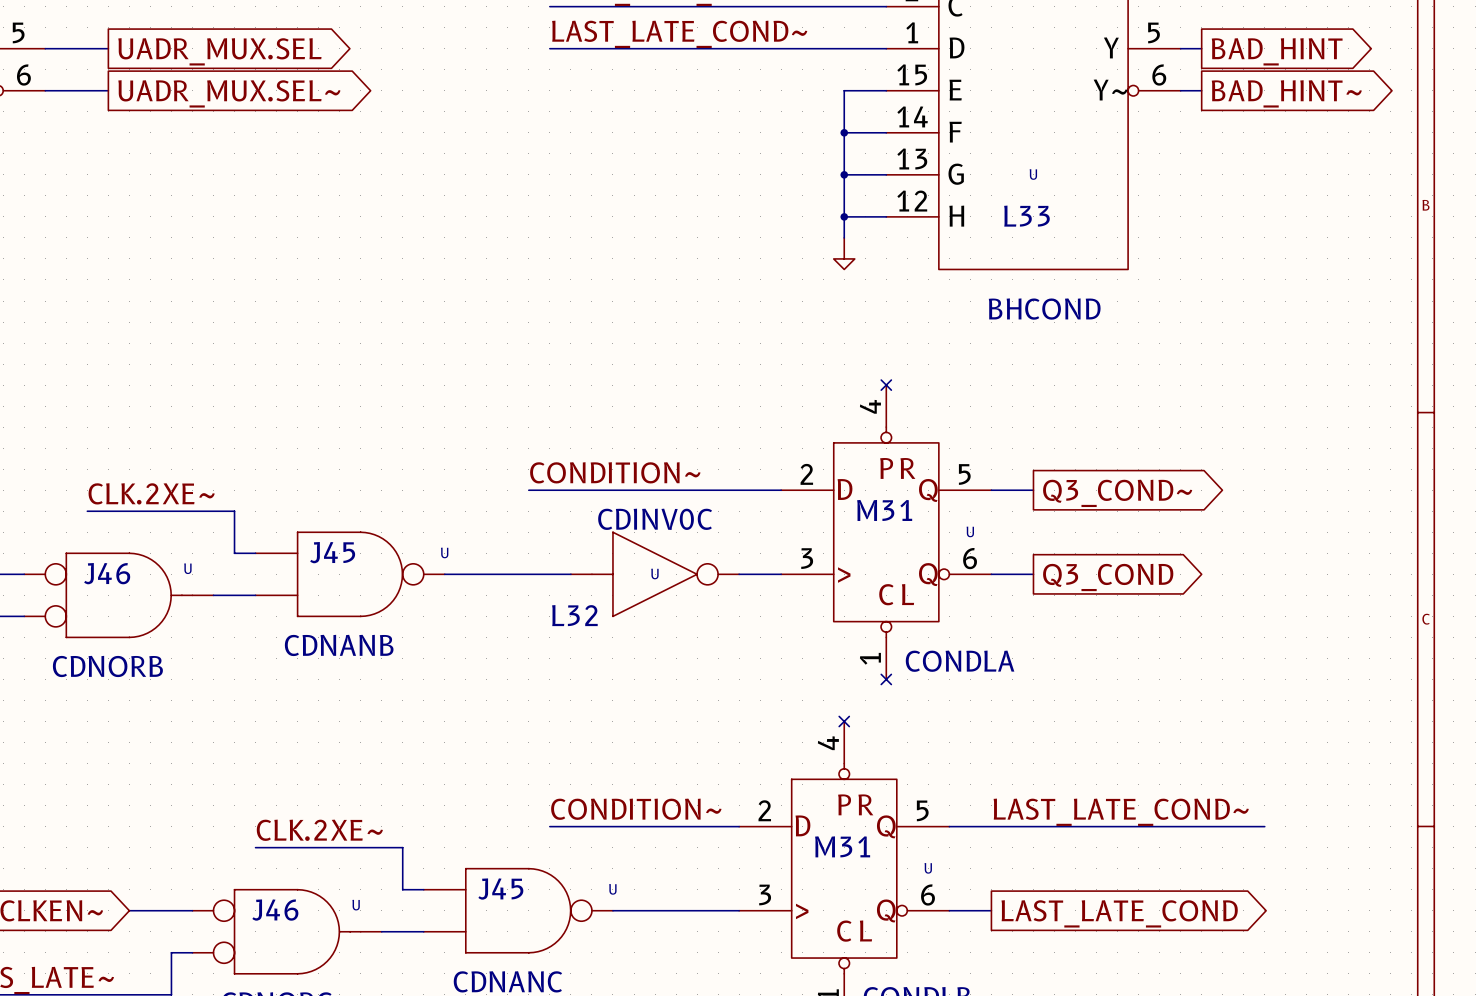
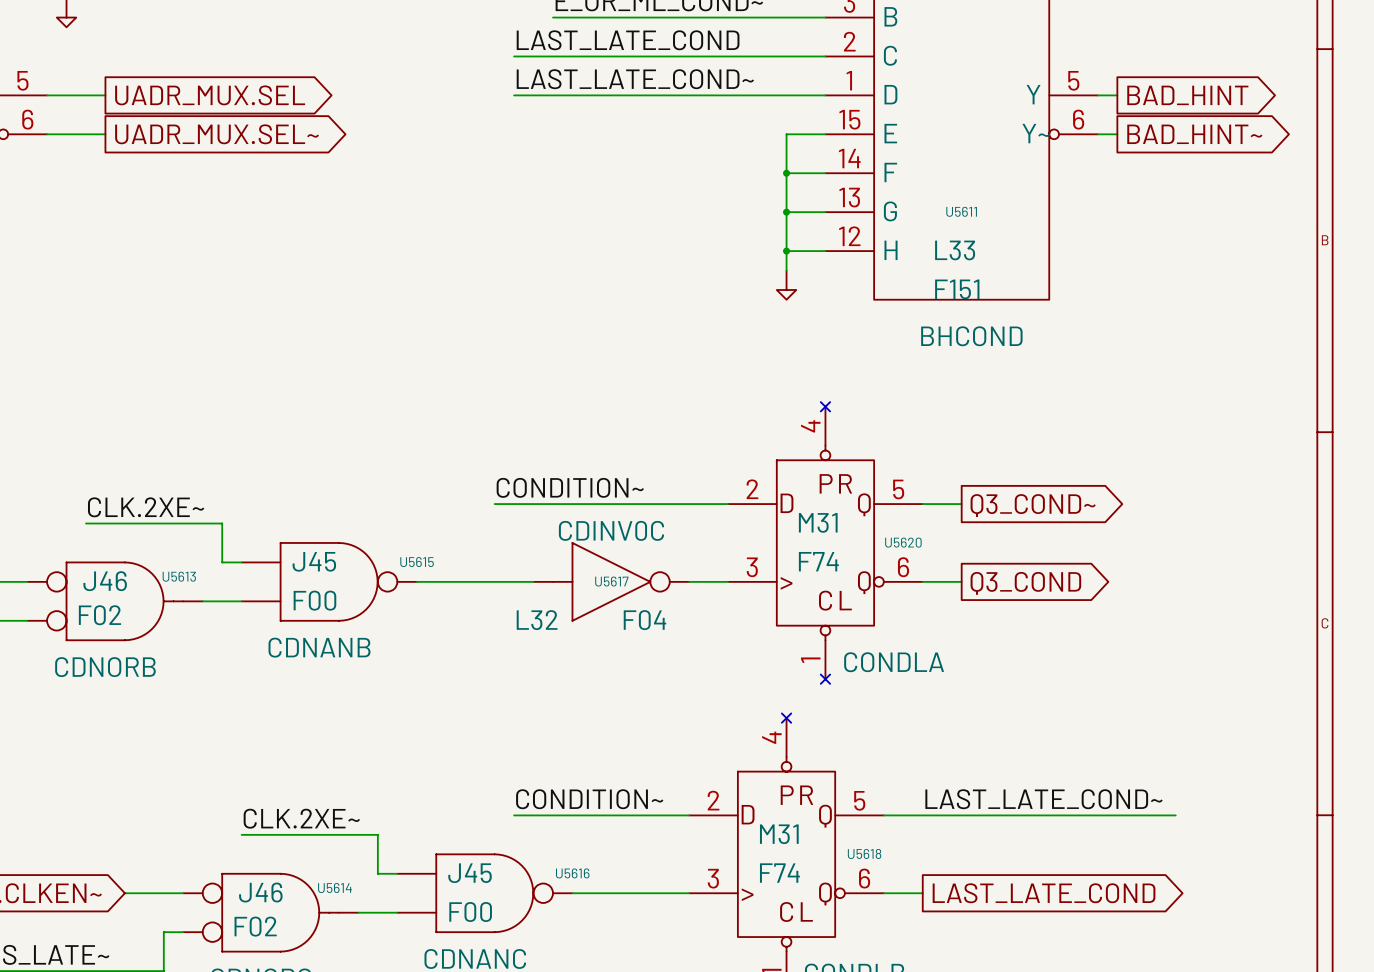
U name: U (1033, 174) -> U5611 (961, 211)
U value: none -> F151 (957, 289)
U name: U (970, 531) -> U5620 (903, 542)
U name: U (444, 552) -> U5615 (417, 562)
U value: none -> F74 (818, 561)
U name: U (187, 568) -> U5613 (179, 576)
U name: U (654, 573) -> U5617 (611, 581)
U value: none -> F00 (314, 600)
U value: none -> F02 (99, 615)
U value: none -> F04 (644, 620)
U name: U (928, 868) -> U5618 (864, 853)
U value: none -> F74 (779, 873)
U name: U (612, 889) -> U5616 (572, 873)
U name: U (356, 905) -> U5614 (335, 888)
U value: none -> F00 (470, 911)
U value: none -> F02 (255, 926)

